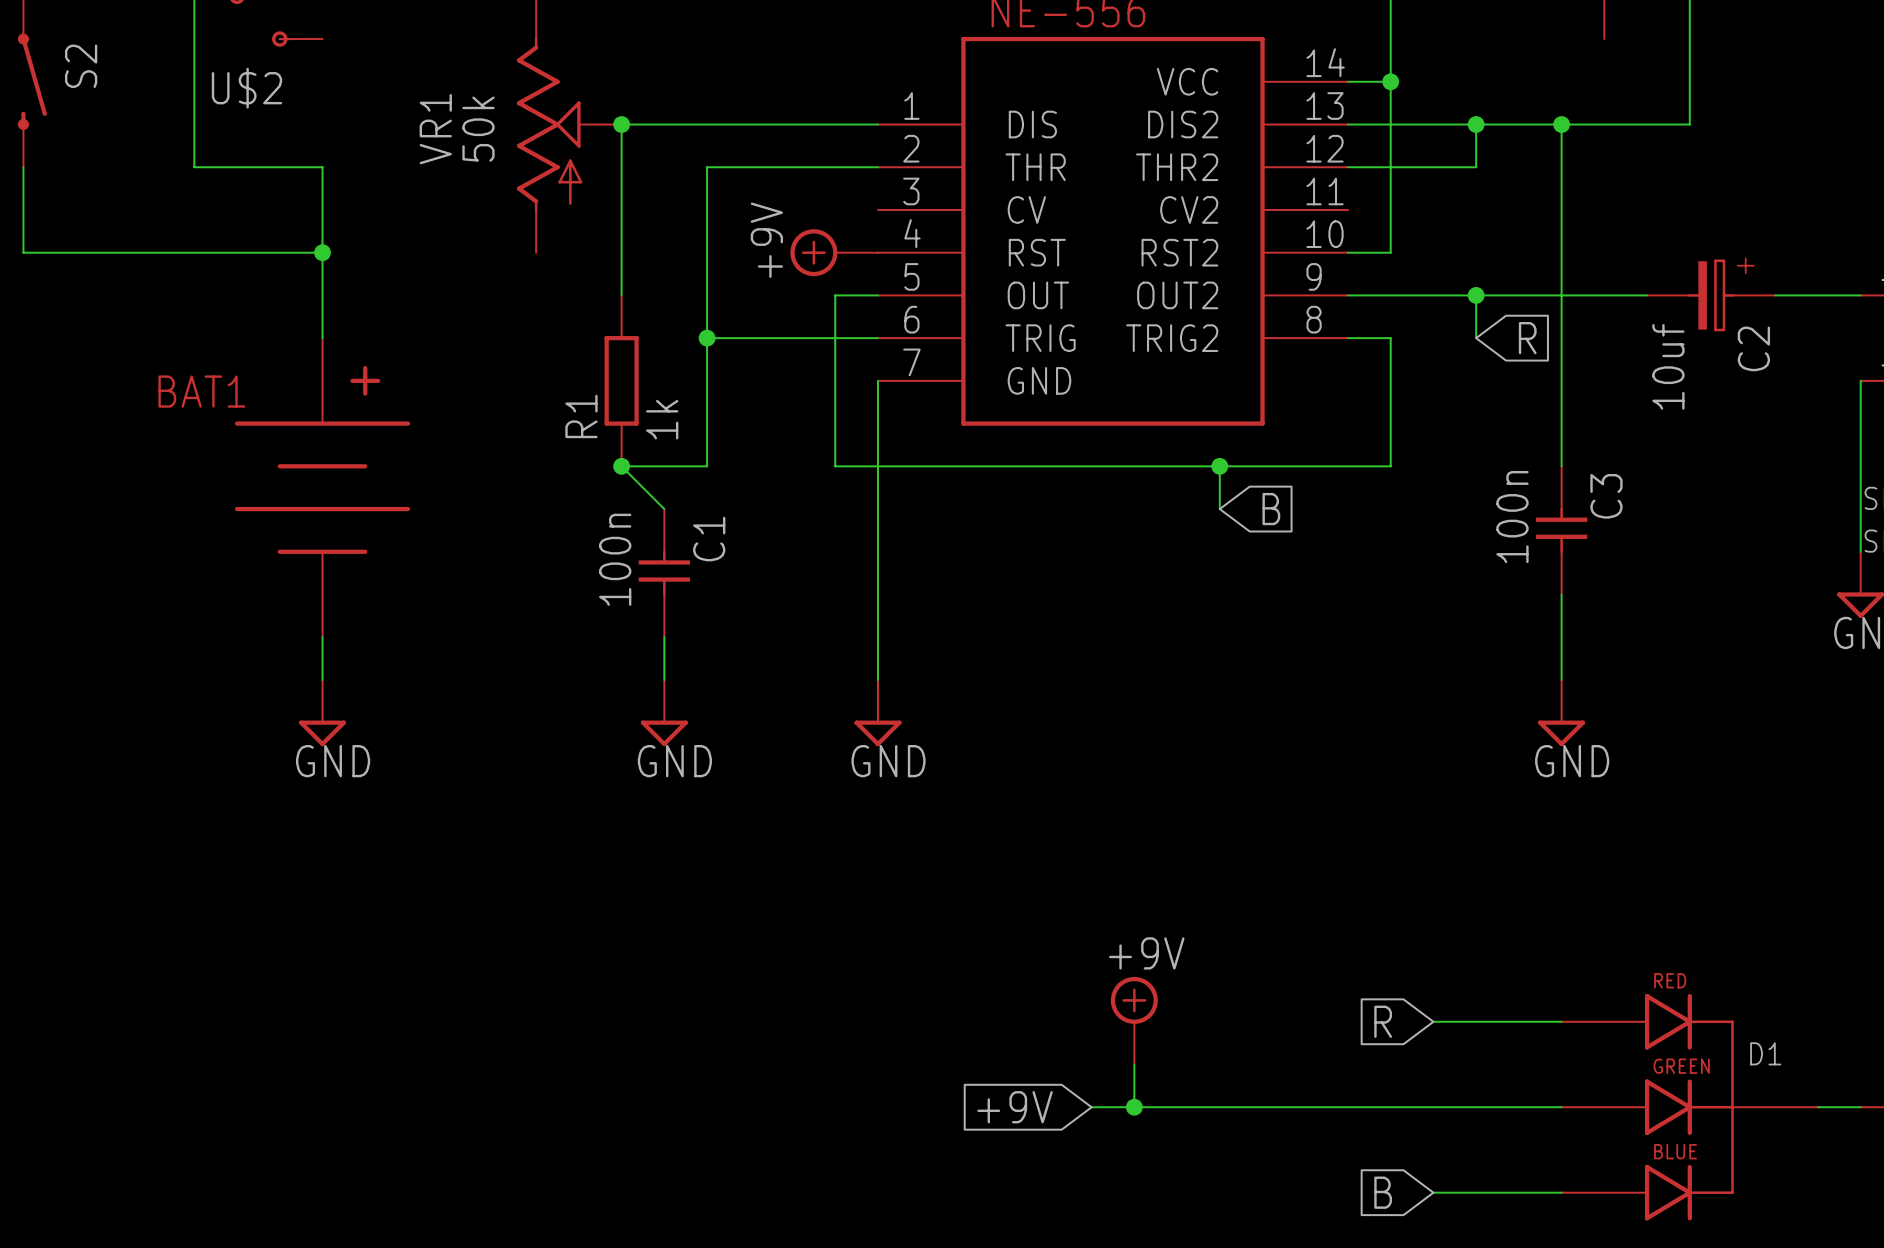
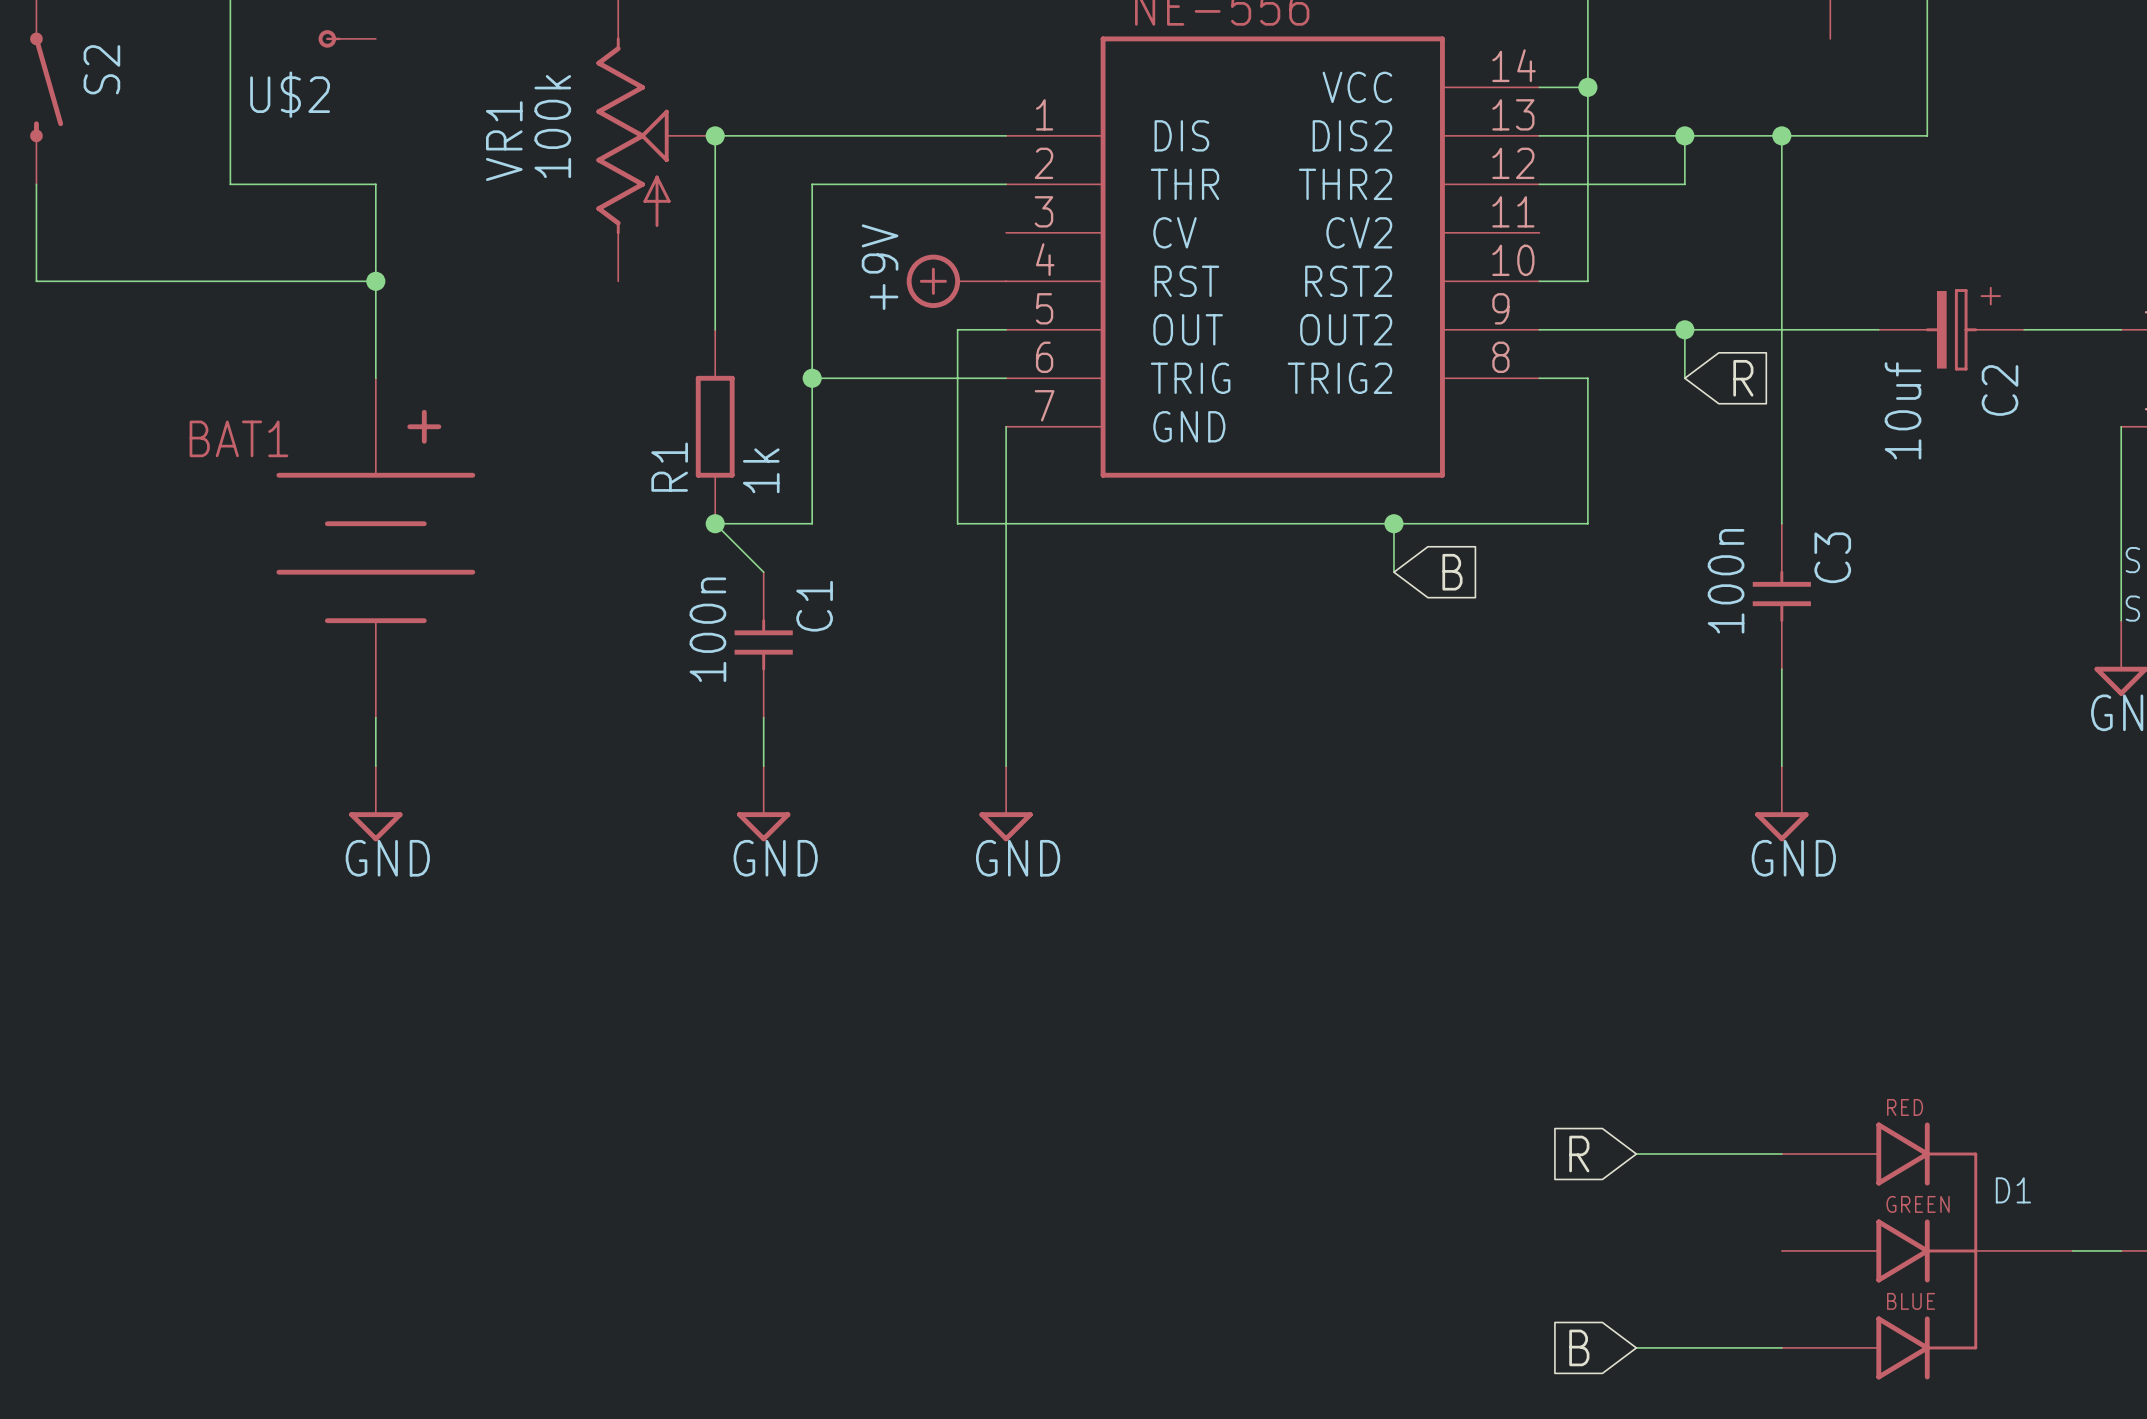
VR1 value: 50k (478, 129) -> 100k (552, 126)
power symbol: +9V (1134, 1020) -> none
wire: (1134, 1064) (1134, 1107) -> none
global label: +9V (1015, 1107) -> none
wire: (1091, 1107) (1561, 1107) -> none
junction: (1134, 1107) -> none

